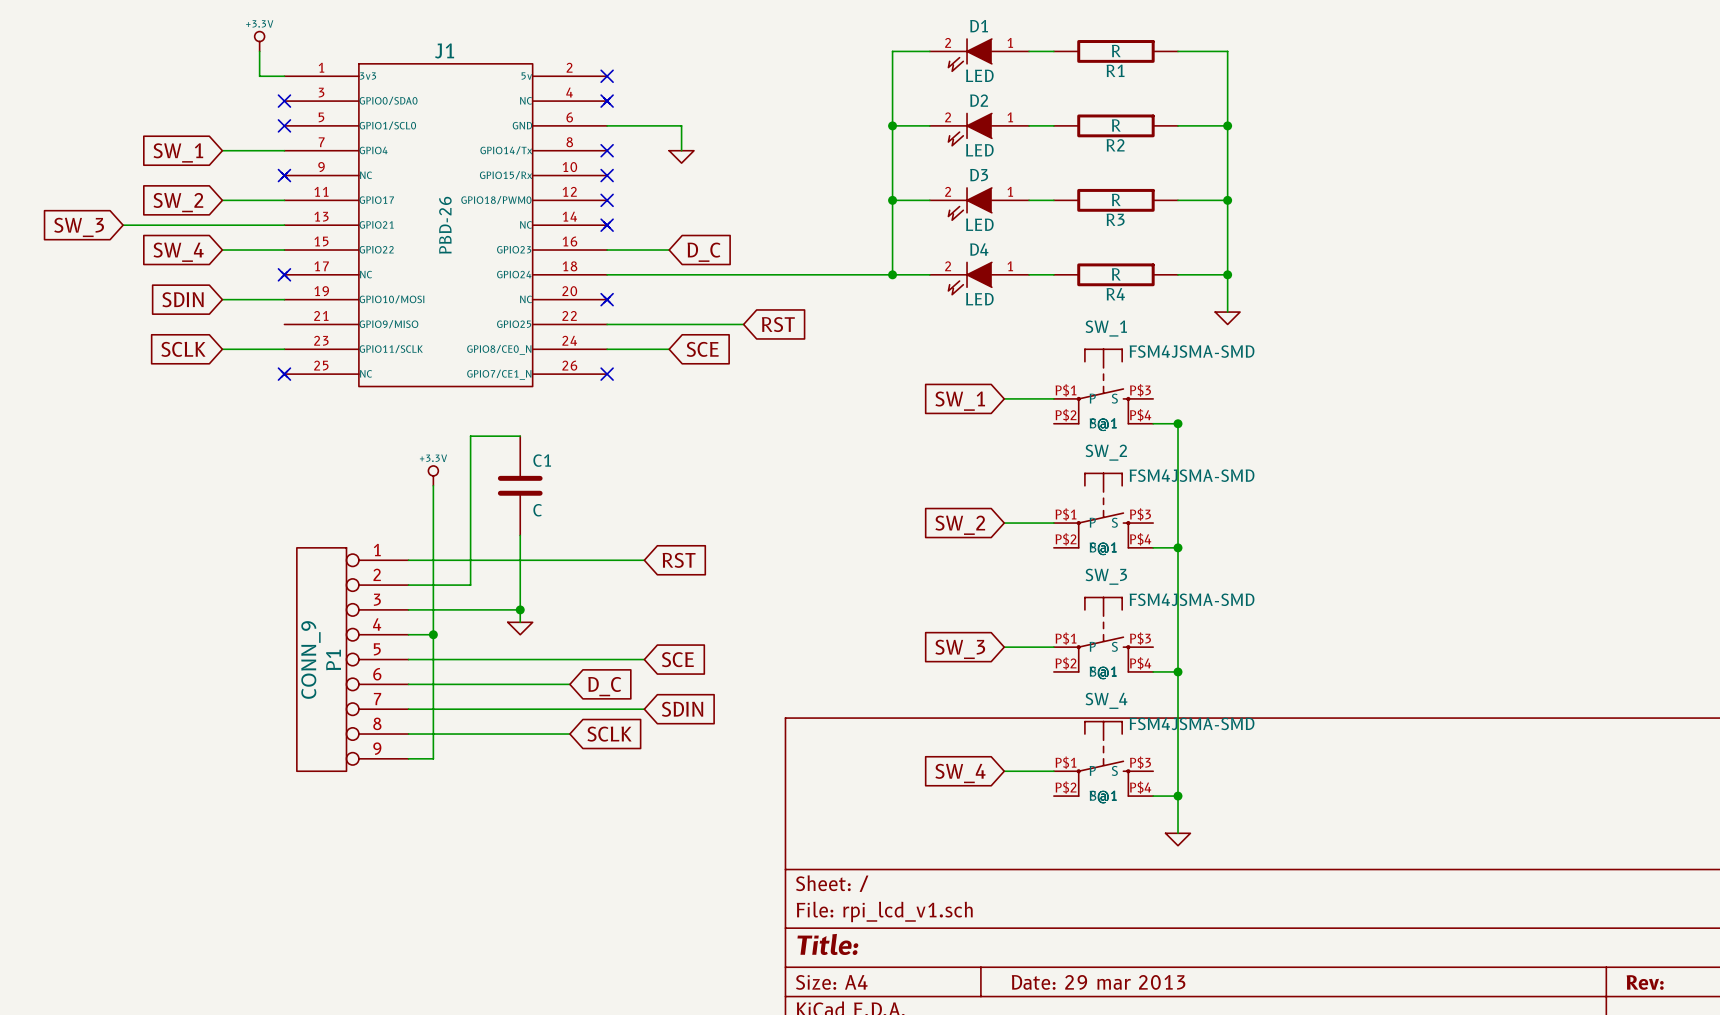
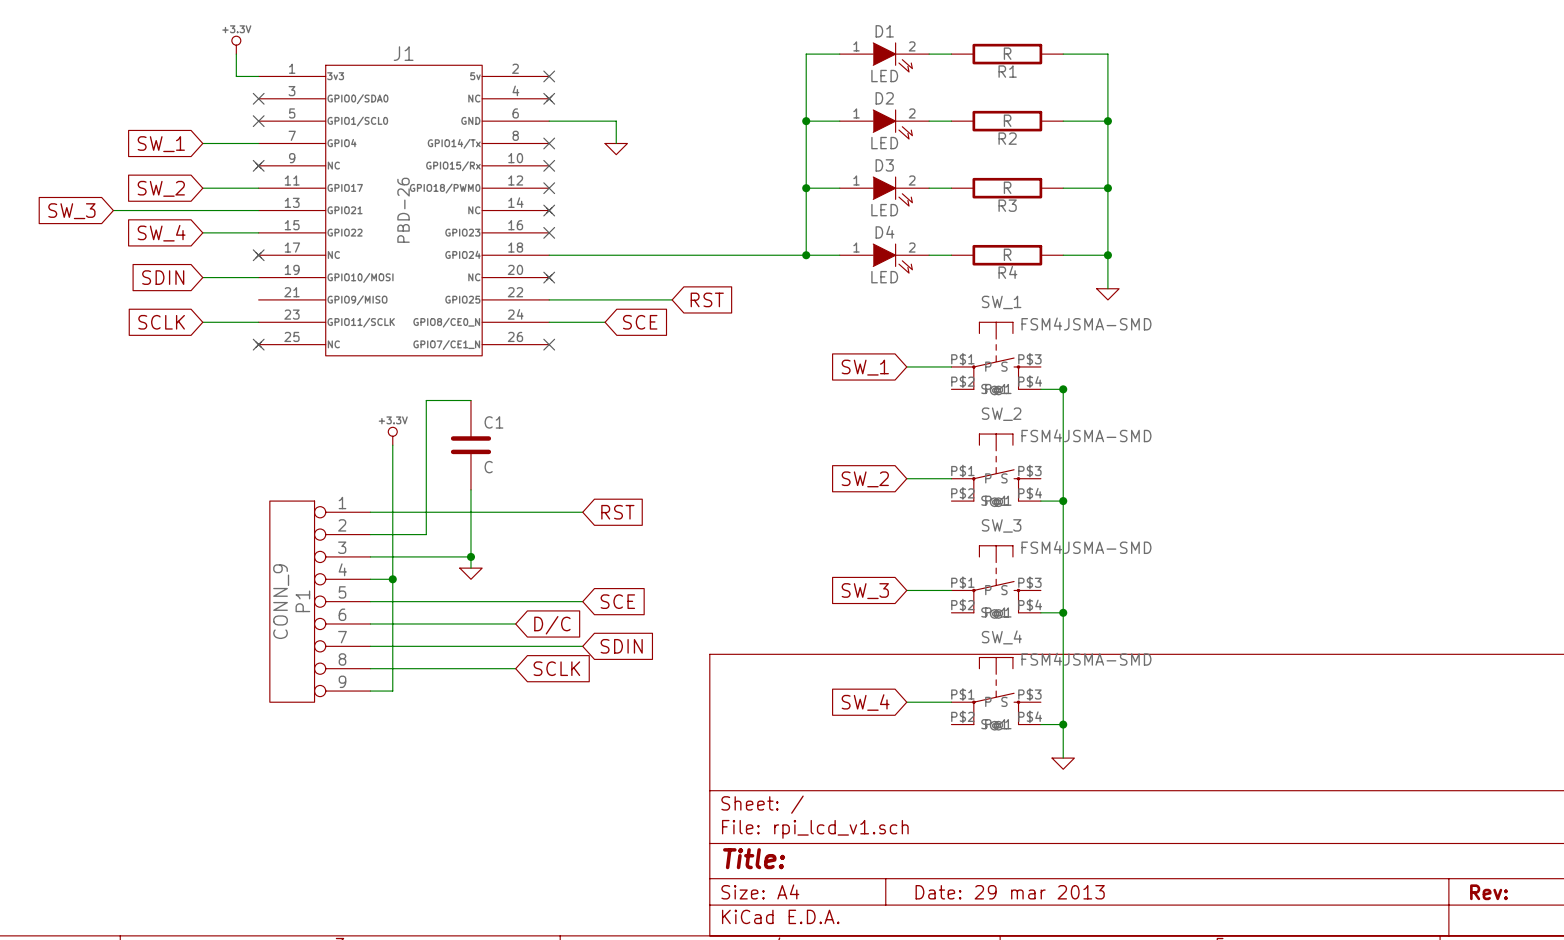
D1 flip: as is (970, 55) -> left-right (892, 57)
D2 flip: as is (970, 129) -> left-right (892, 124)
D3 flip: as is (970, 204) -> left-right (892, 191)
wire: (607, 250) (669, 250) -> none
no-connect mark: none -> (549, 232)
global label: D_C (704, 252) -> none
D4 flip: as is (970, 278) -> left-right (892, 258)
global label: D_C (604, 686) -> D/C (552, 625)

